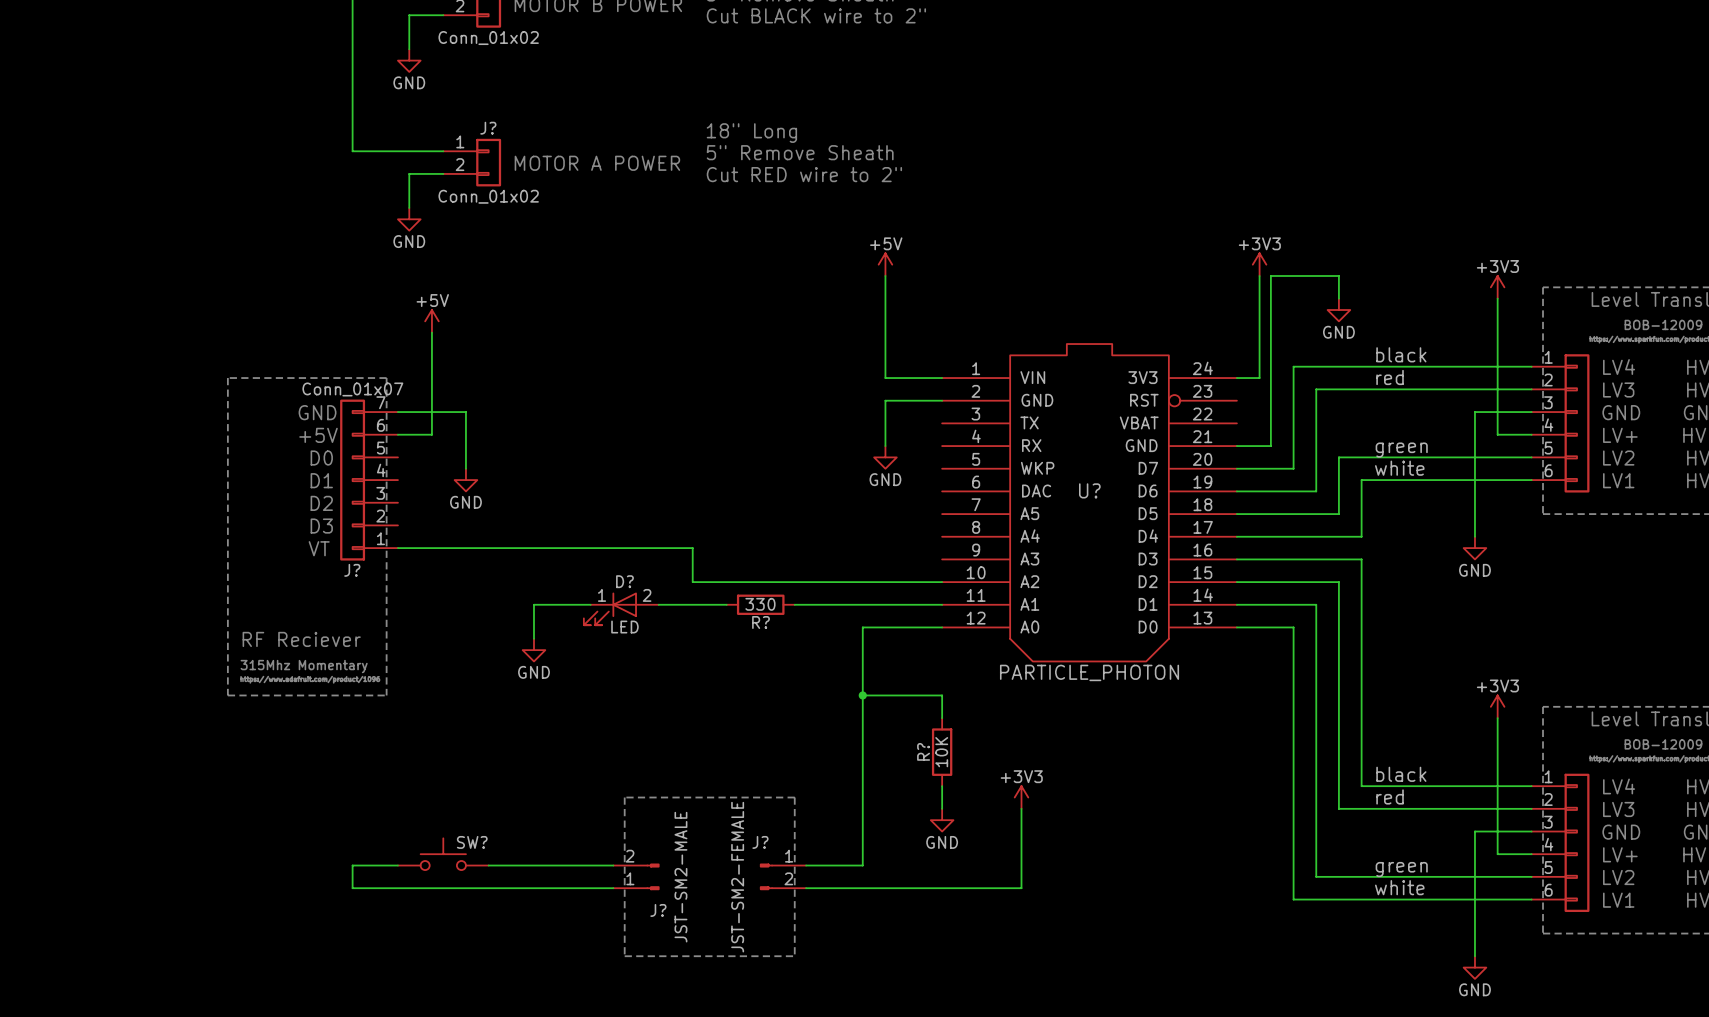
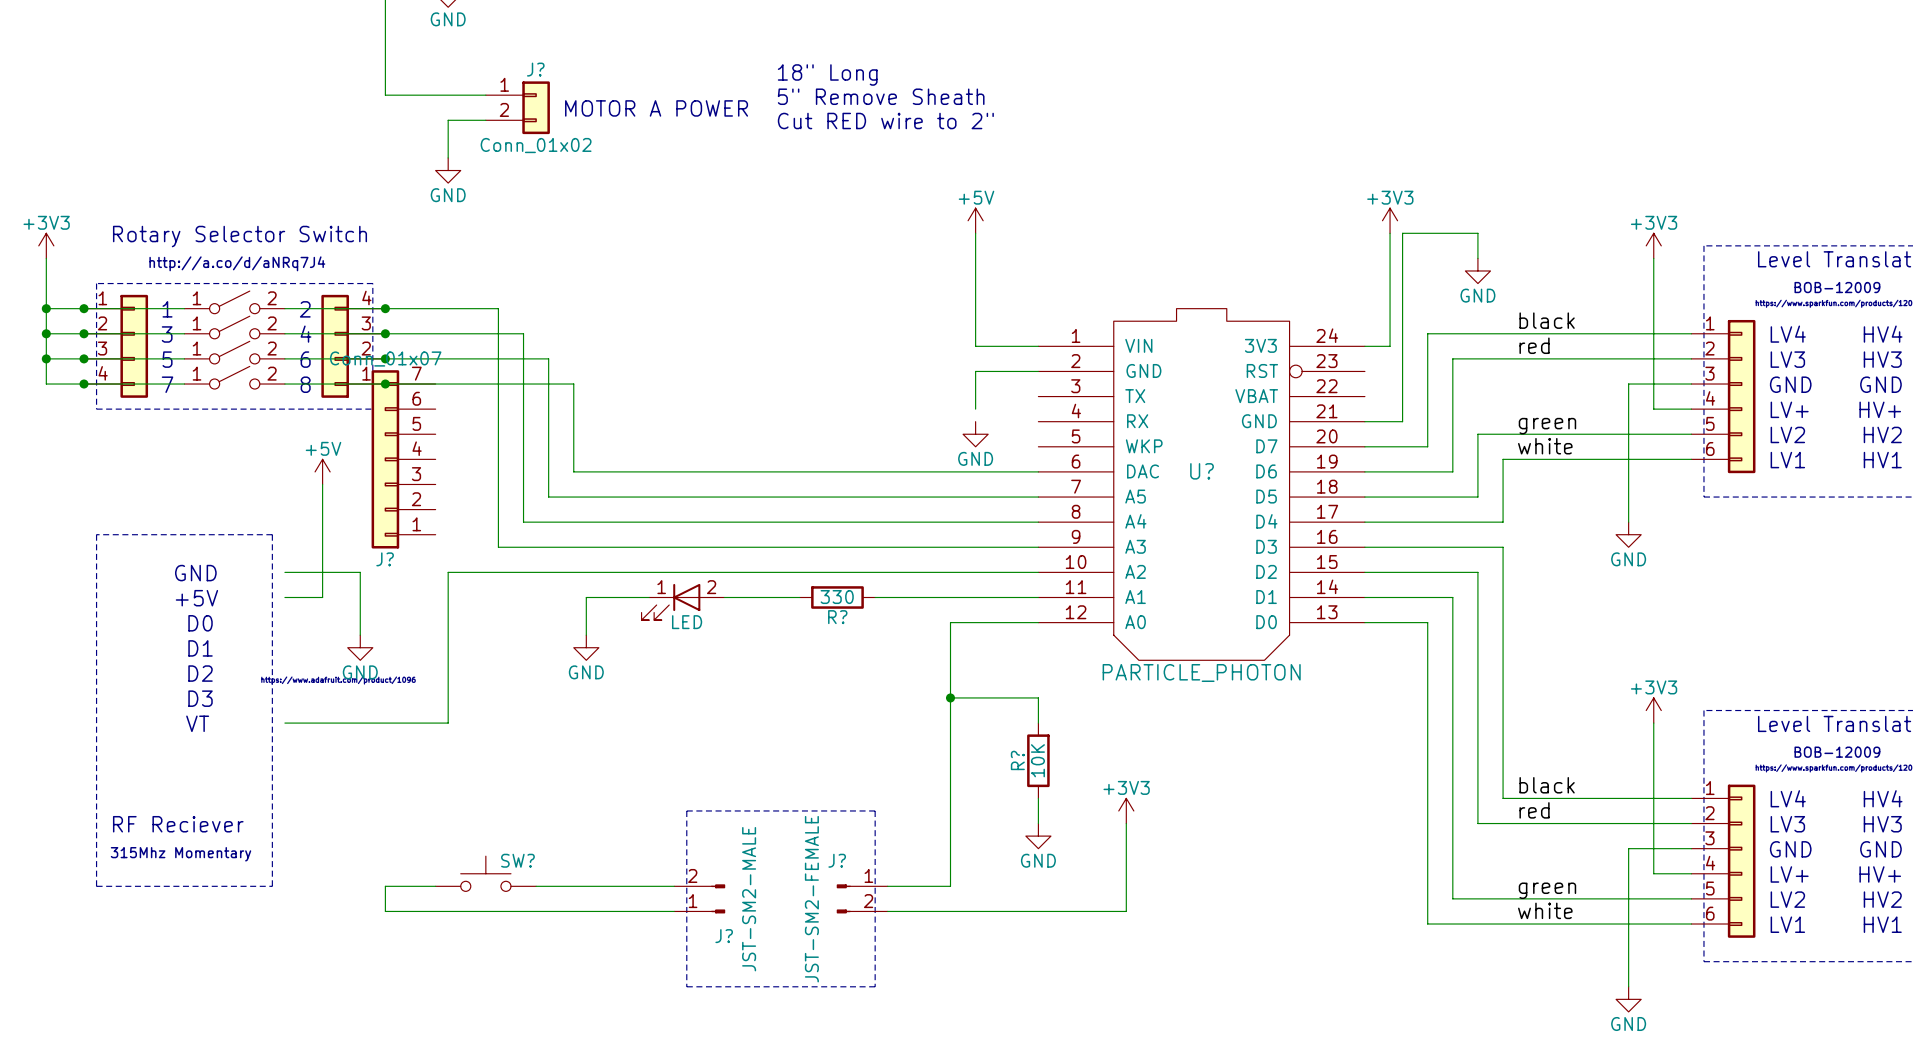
text: none -> Rotary Selector Switch (239, 236)
power symbol: none -> +3V3 (46, 245)
wire: none -> (46, 258) (46, 384) (184, 384)
text: none -> http://a.co/d/aNRq7J4 (237, 263)
line: none -> (96, 283) (96, 409) (372, 409) (372, 283) (96, 283)
power symbol position: +5V (431, 321) -> +5V (322, 471)
wire: (431, 332) (431, 434) (397, 434) -> (322, 484) (322, 597) (284, 597)
part: none -> (234, 302)
wire: none -> (46, 308) (184, 308)
junction: none -> (46, 308)
junction: none -> (84, 308)
text: none -> 1 (167, 309)
wire: none -> (284, 308) (498, 308) (498, 547) (1038, 547)
text: none -> 2 (305, 309)
junction: none -> (385, 308)
part: none -> (234, 327)
wire: none -> (46, 333) (184, 333)
junction: none -> (46, 333)
junction: none -> (84, 333)
wire: none -> (284, 333) (523, 333) (523, 522) (1038, 522)
junction: none -> (385, 333)
text: none -> 3 (167, 334)
text: none -> 4 (306, 334)
part: none -> (116, 346)
line: (227, 378) (386, 378) (386, 695) (227, 695) (227, 378) -> (96, 534) (272, 534) (272, 886) (96, 886) (96, 534)
part: none -> (353, 346)
part: none -> (234, 352)
wire: none -> (46, 358) (184, 358)
junction: none -> (46, 358)
junction: none -> (84, 358)
wire: none -> (284, 358) (548, 358) (548, 497) (1038, 497)
junction: none -> (385, 358)
text: none -> 5 (167, 359)
text: none -> 6 (305, 359)
part: none -> (234, 377)
junction: none -> (84, 384)
text: none -> 7 (167, 384)
wire: none -> (284, 384) (435, 384)
text: none -> 8 (305, 384)
text position: GND (317, 412) -> GND (195, 573)
junction: none -> (385, 384)
wire: (465, 412) (465, 468) -> (510, 384) (573, 384) (573, 471) (1038, 471)
wire: (885, 434) (885, 446) -> none
text position: +5V (318, 435) -> +5V (196, 598)
text position: D0 (321, 458) -> D0 (200, 623)
text position: D1 (321, 480) -> D1 (200, 648)
power symbol position: GND (465, 480) -> GND (360, 647)
text position: D2 (321, 503) -> D2 (200, 673)
text position: D3 (321, 526) -> D3 (200, 698)
text position: VT (319, 548) -> VT (197, 723)
wire: (397, 548) (692, 548) (692, 582) -> (284, 723) (448, 723) (448, 572) (762, 572)
D? name: D? (624, 581) -> none
wire: none -> (284, 572) (360, 572) (360, 635)
text position: RF Reciever (301, 639) -> RF Reciever (178, 824)
text position: 315Mhz Momentary (304, 666) -> 315Mhz Momentary (181, 854)

